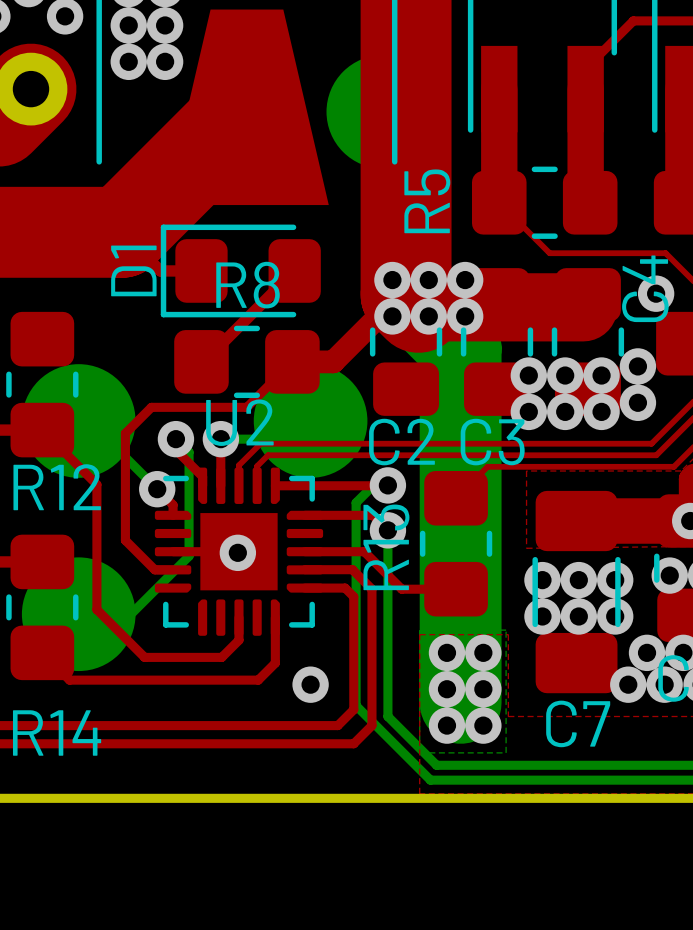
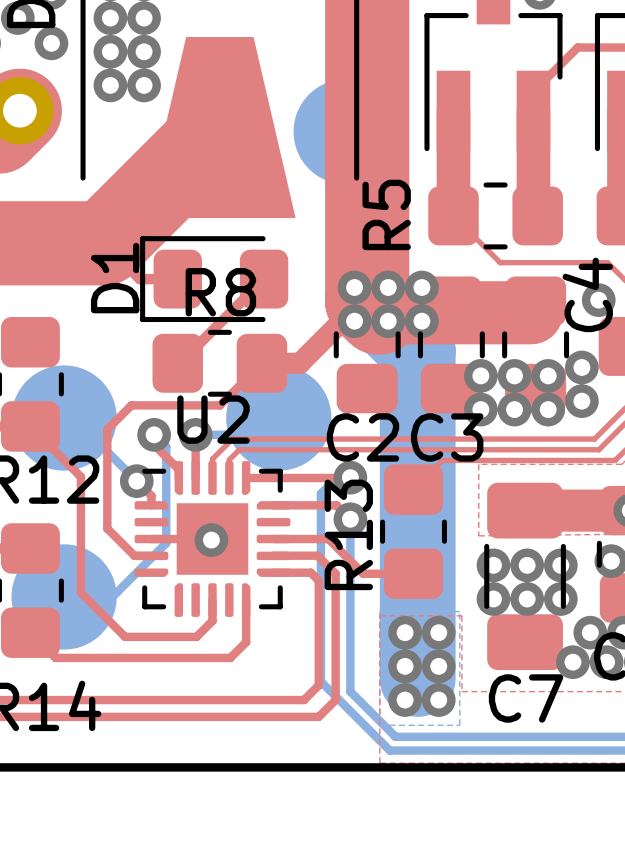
via: (310, 684) -> none

